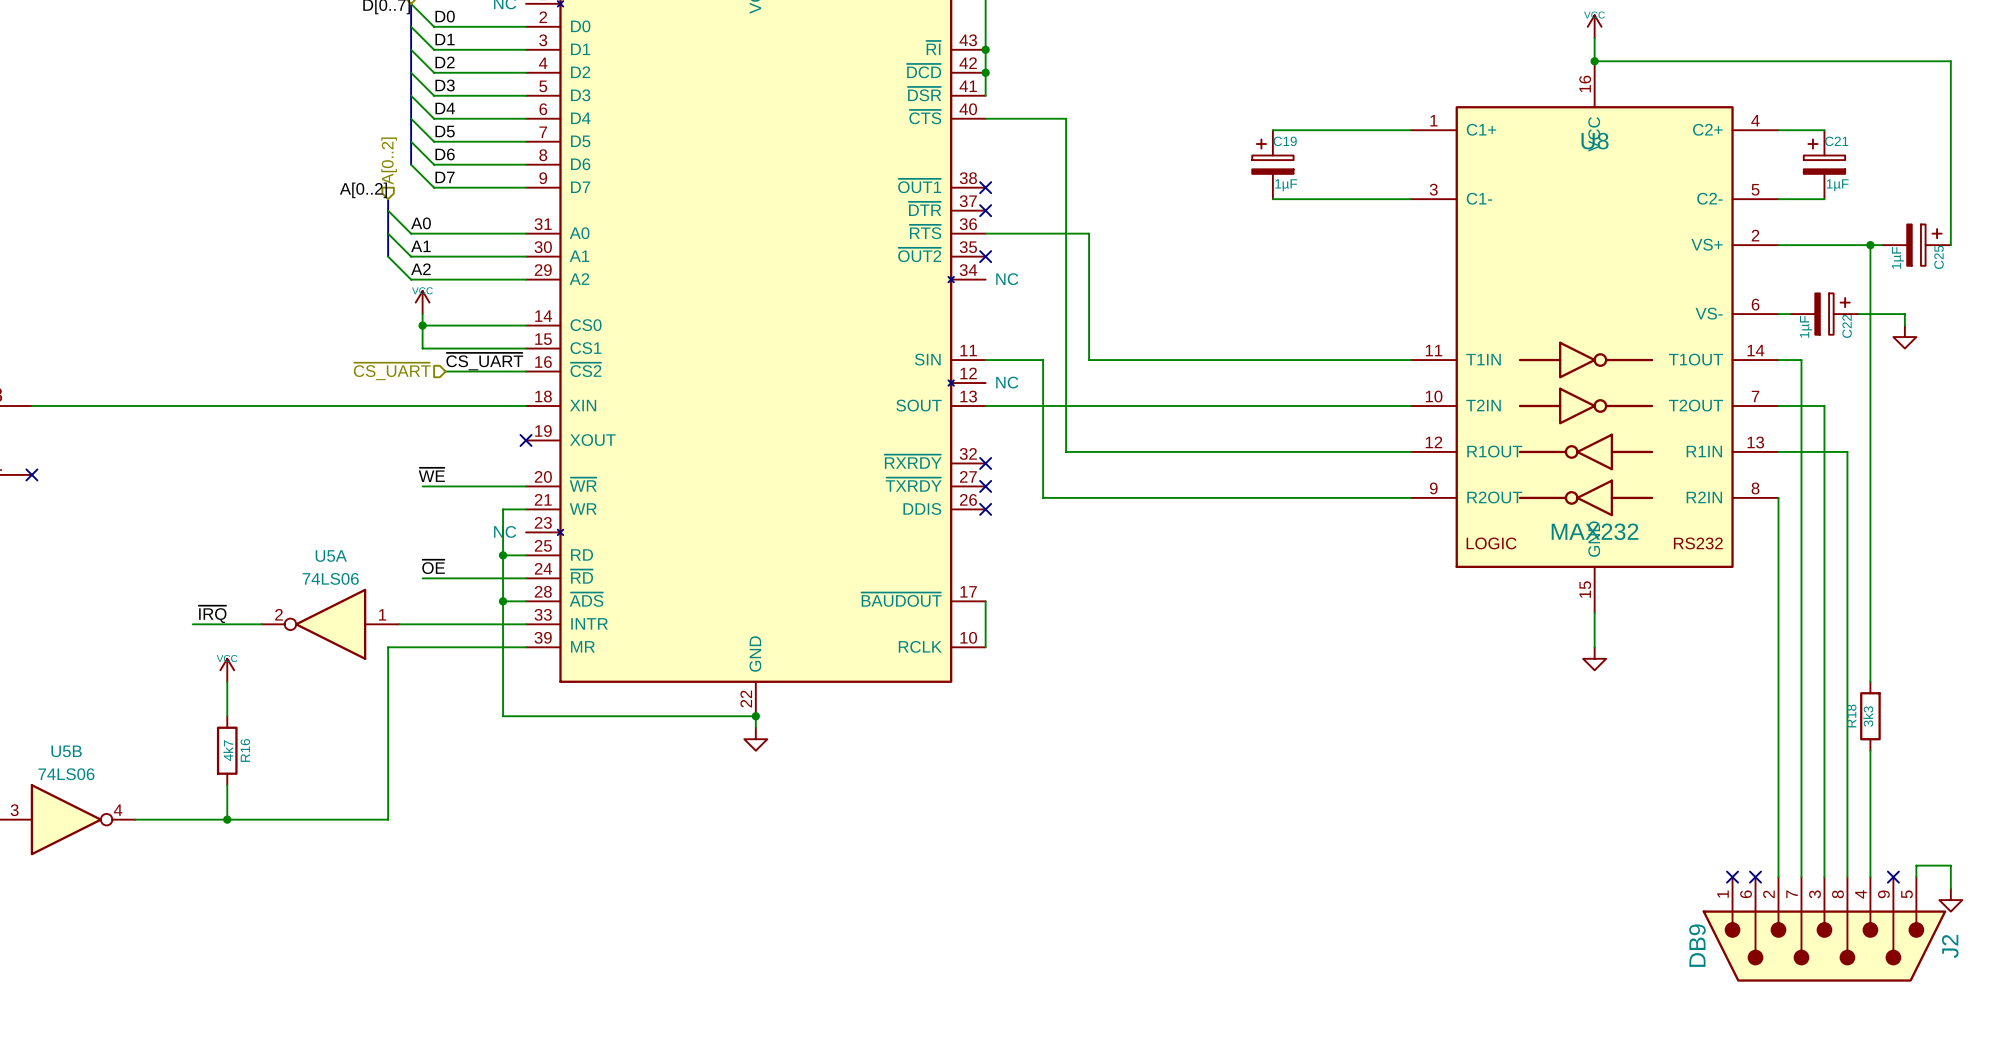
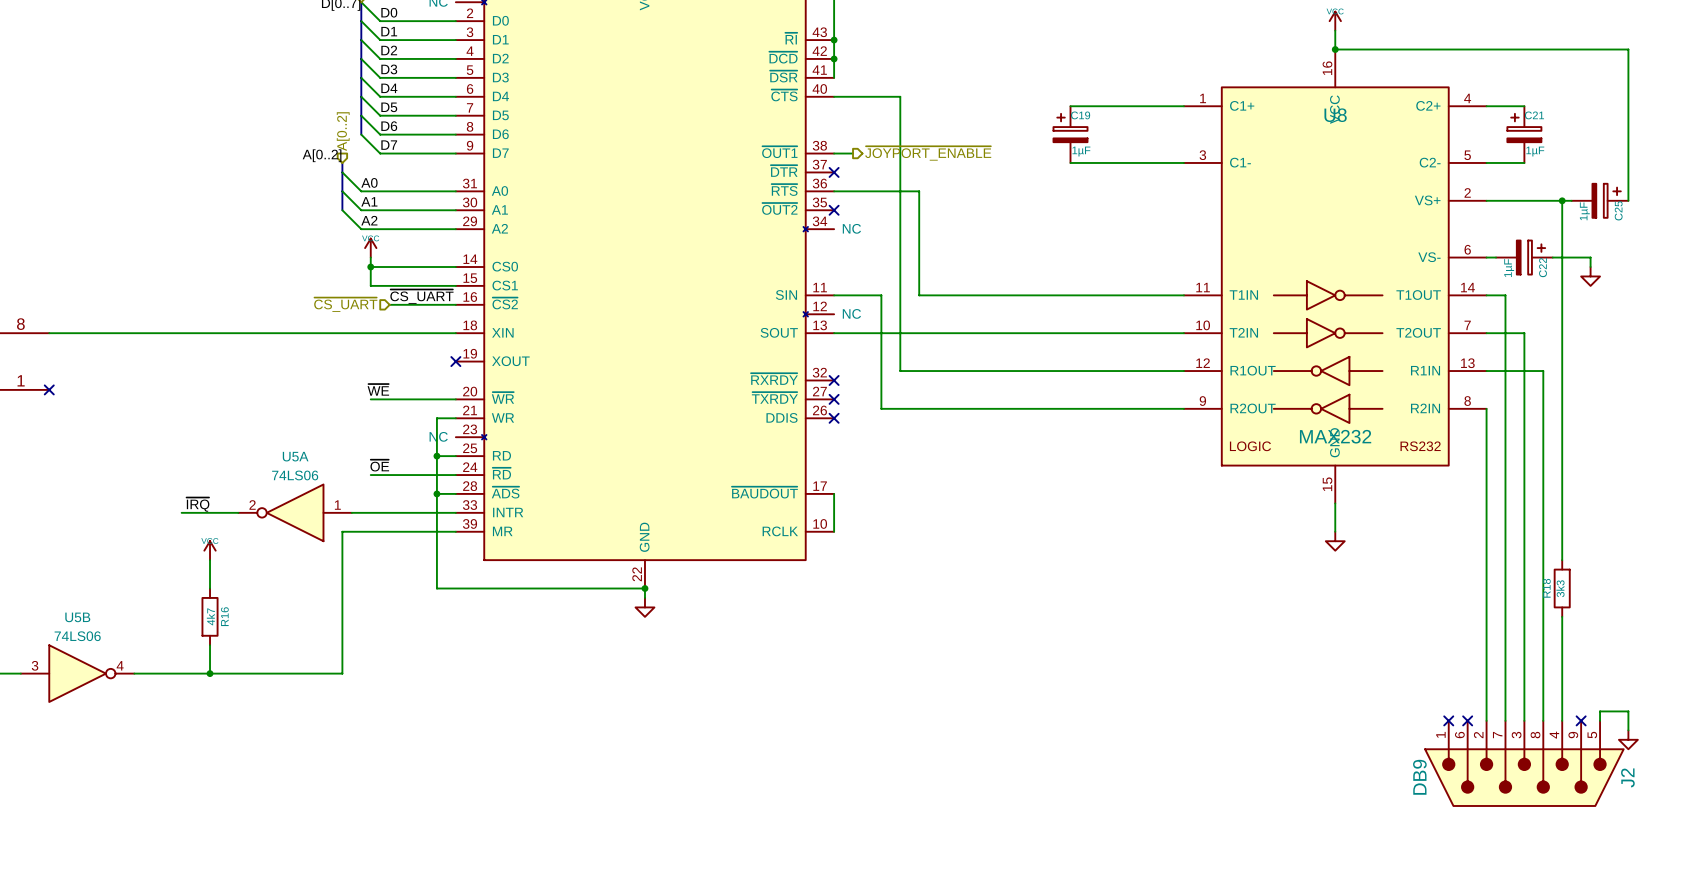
wire: none -> (834, 153) (853, 153)
no-connect mark: (985, 187) -> none
hierarchical label: none -> ~{JOYPORT_ENABLE} (928, 153)

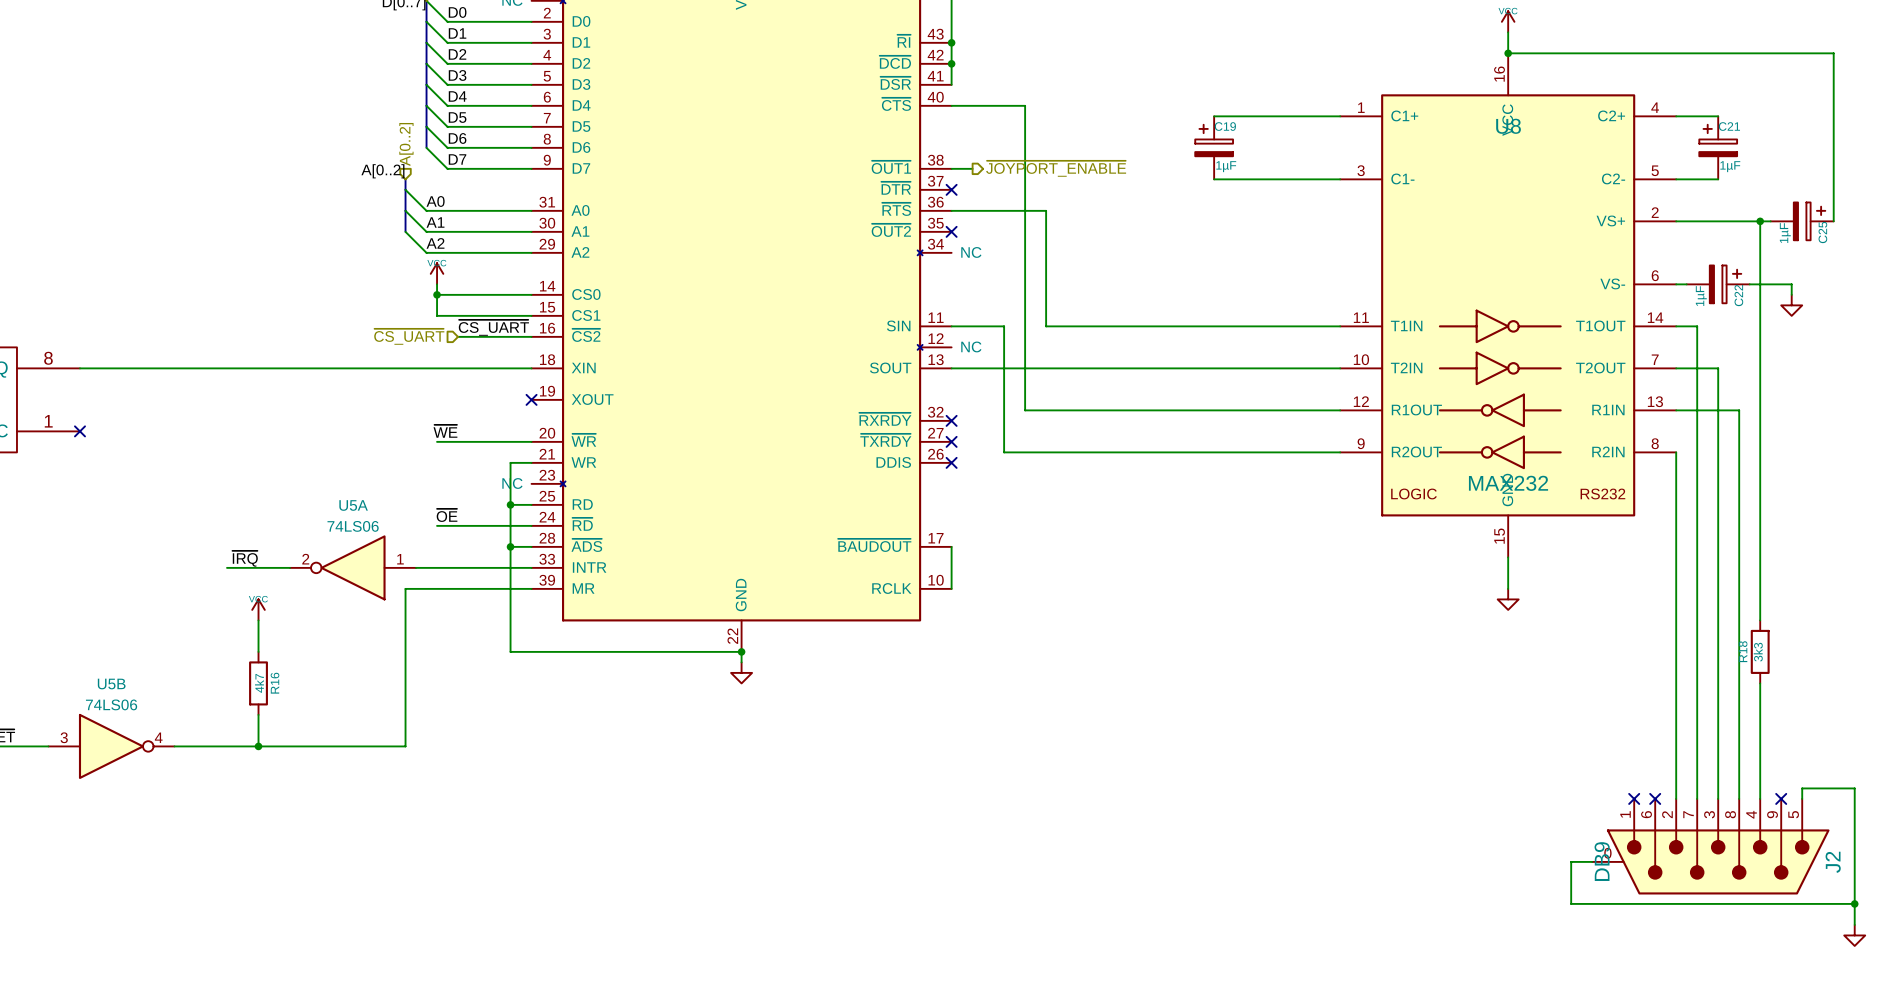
wire: (1628, 711) (1628, 730) -> (1833, 788) (1854, 788) (1854, 924)
J2 symbol: [1424, 720, 1625, 807] -> [1592, 798, 1830, 895]
power symbol position: (1628, 739) -> (1854, 935)
wire: none -> (1592, 861) (1571, 861) (1571, 903) (1854, 903)
junction: none -> (1854, 903)

